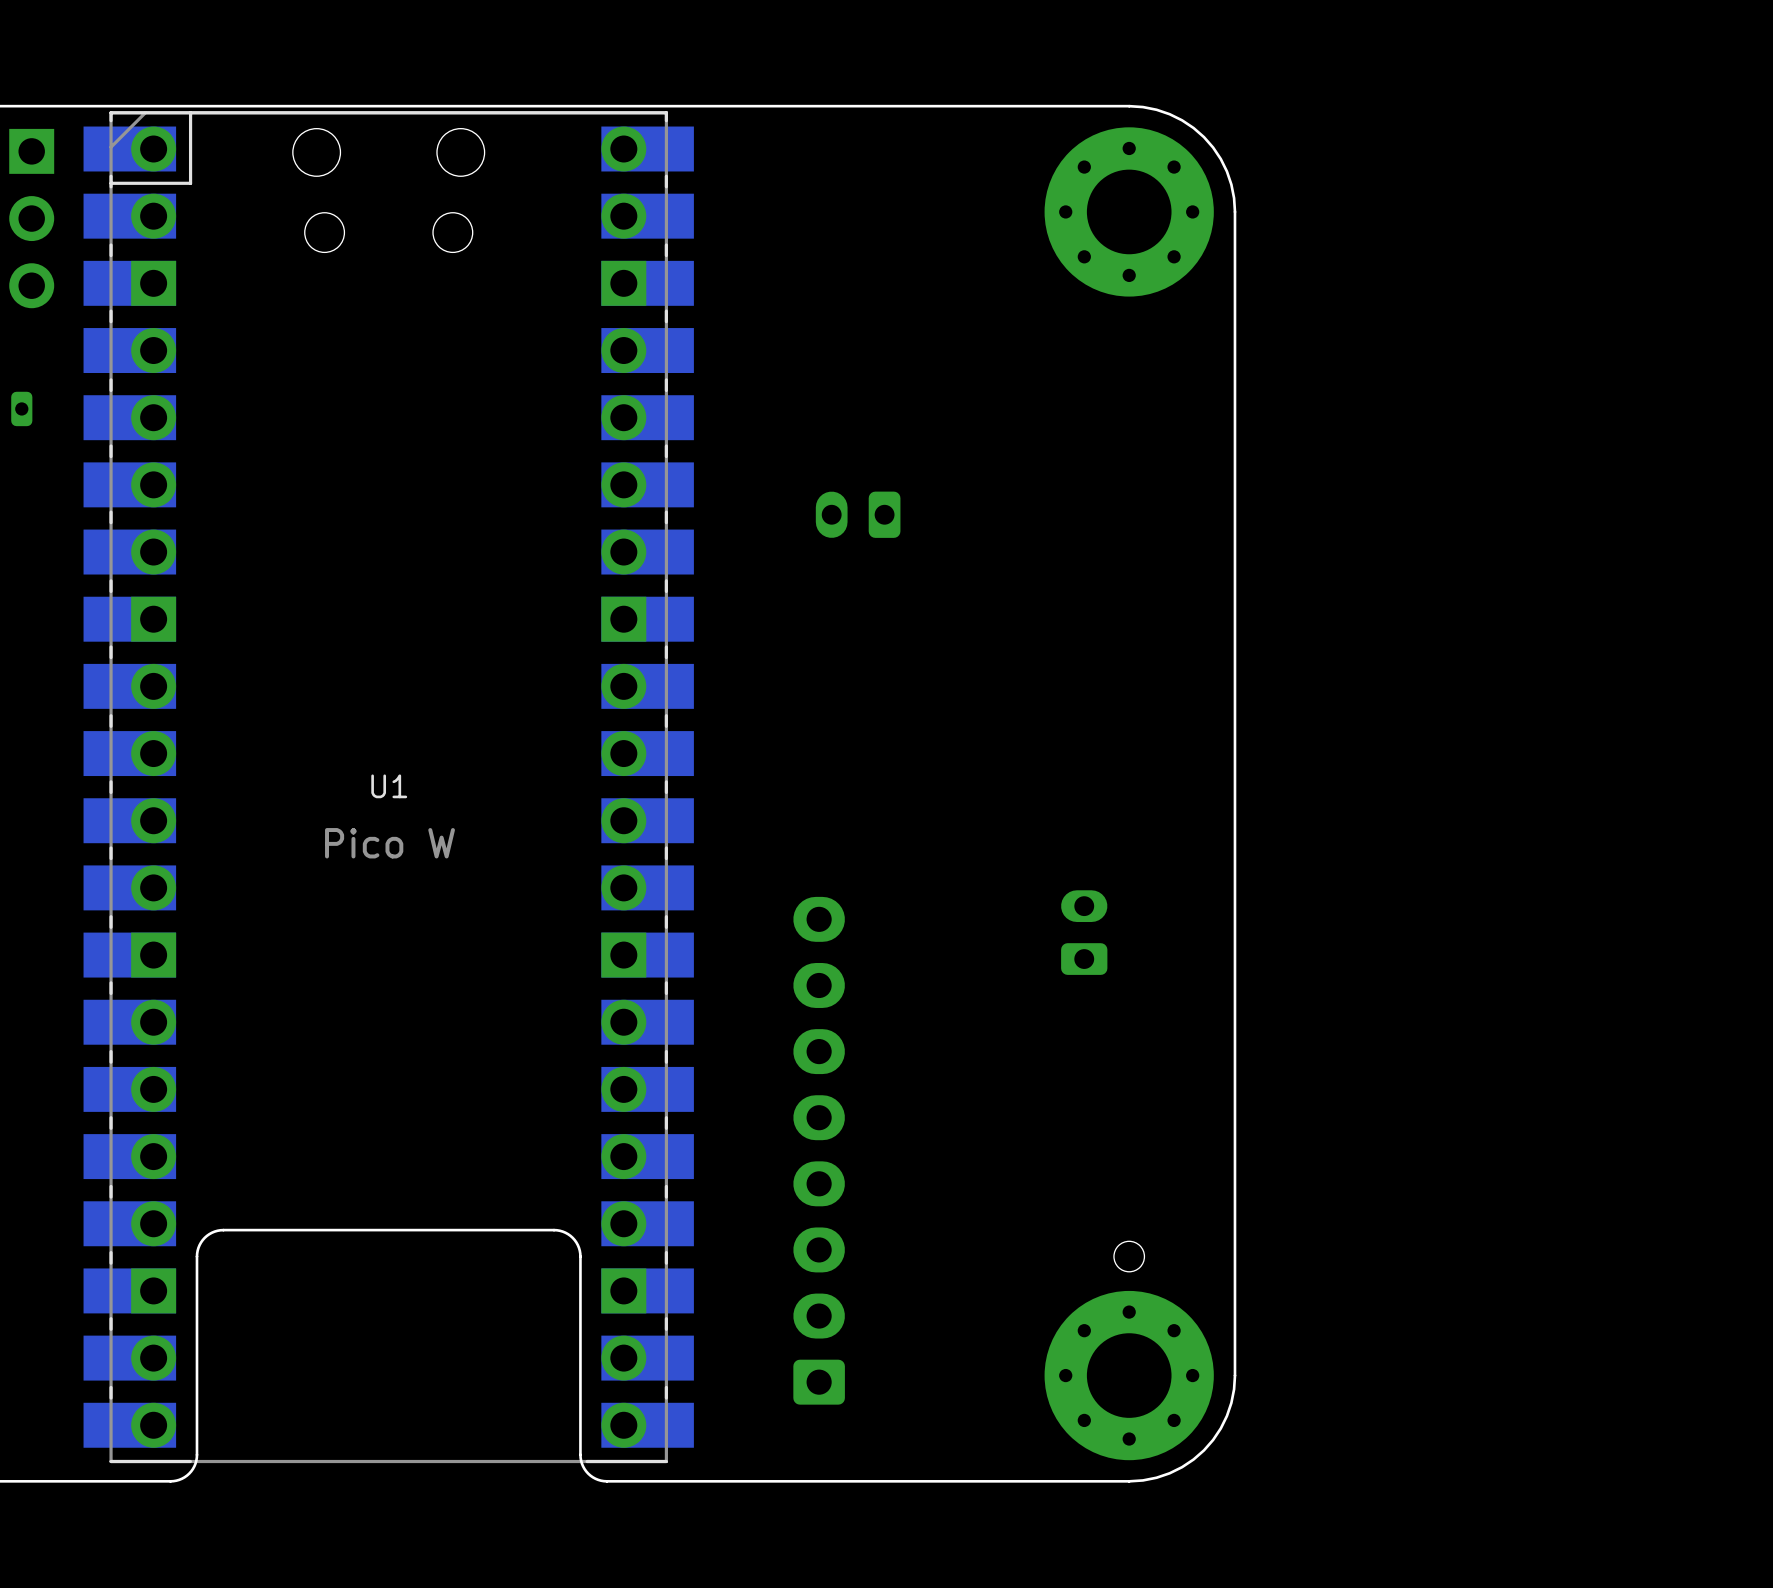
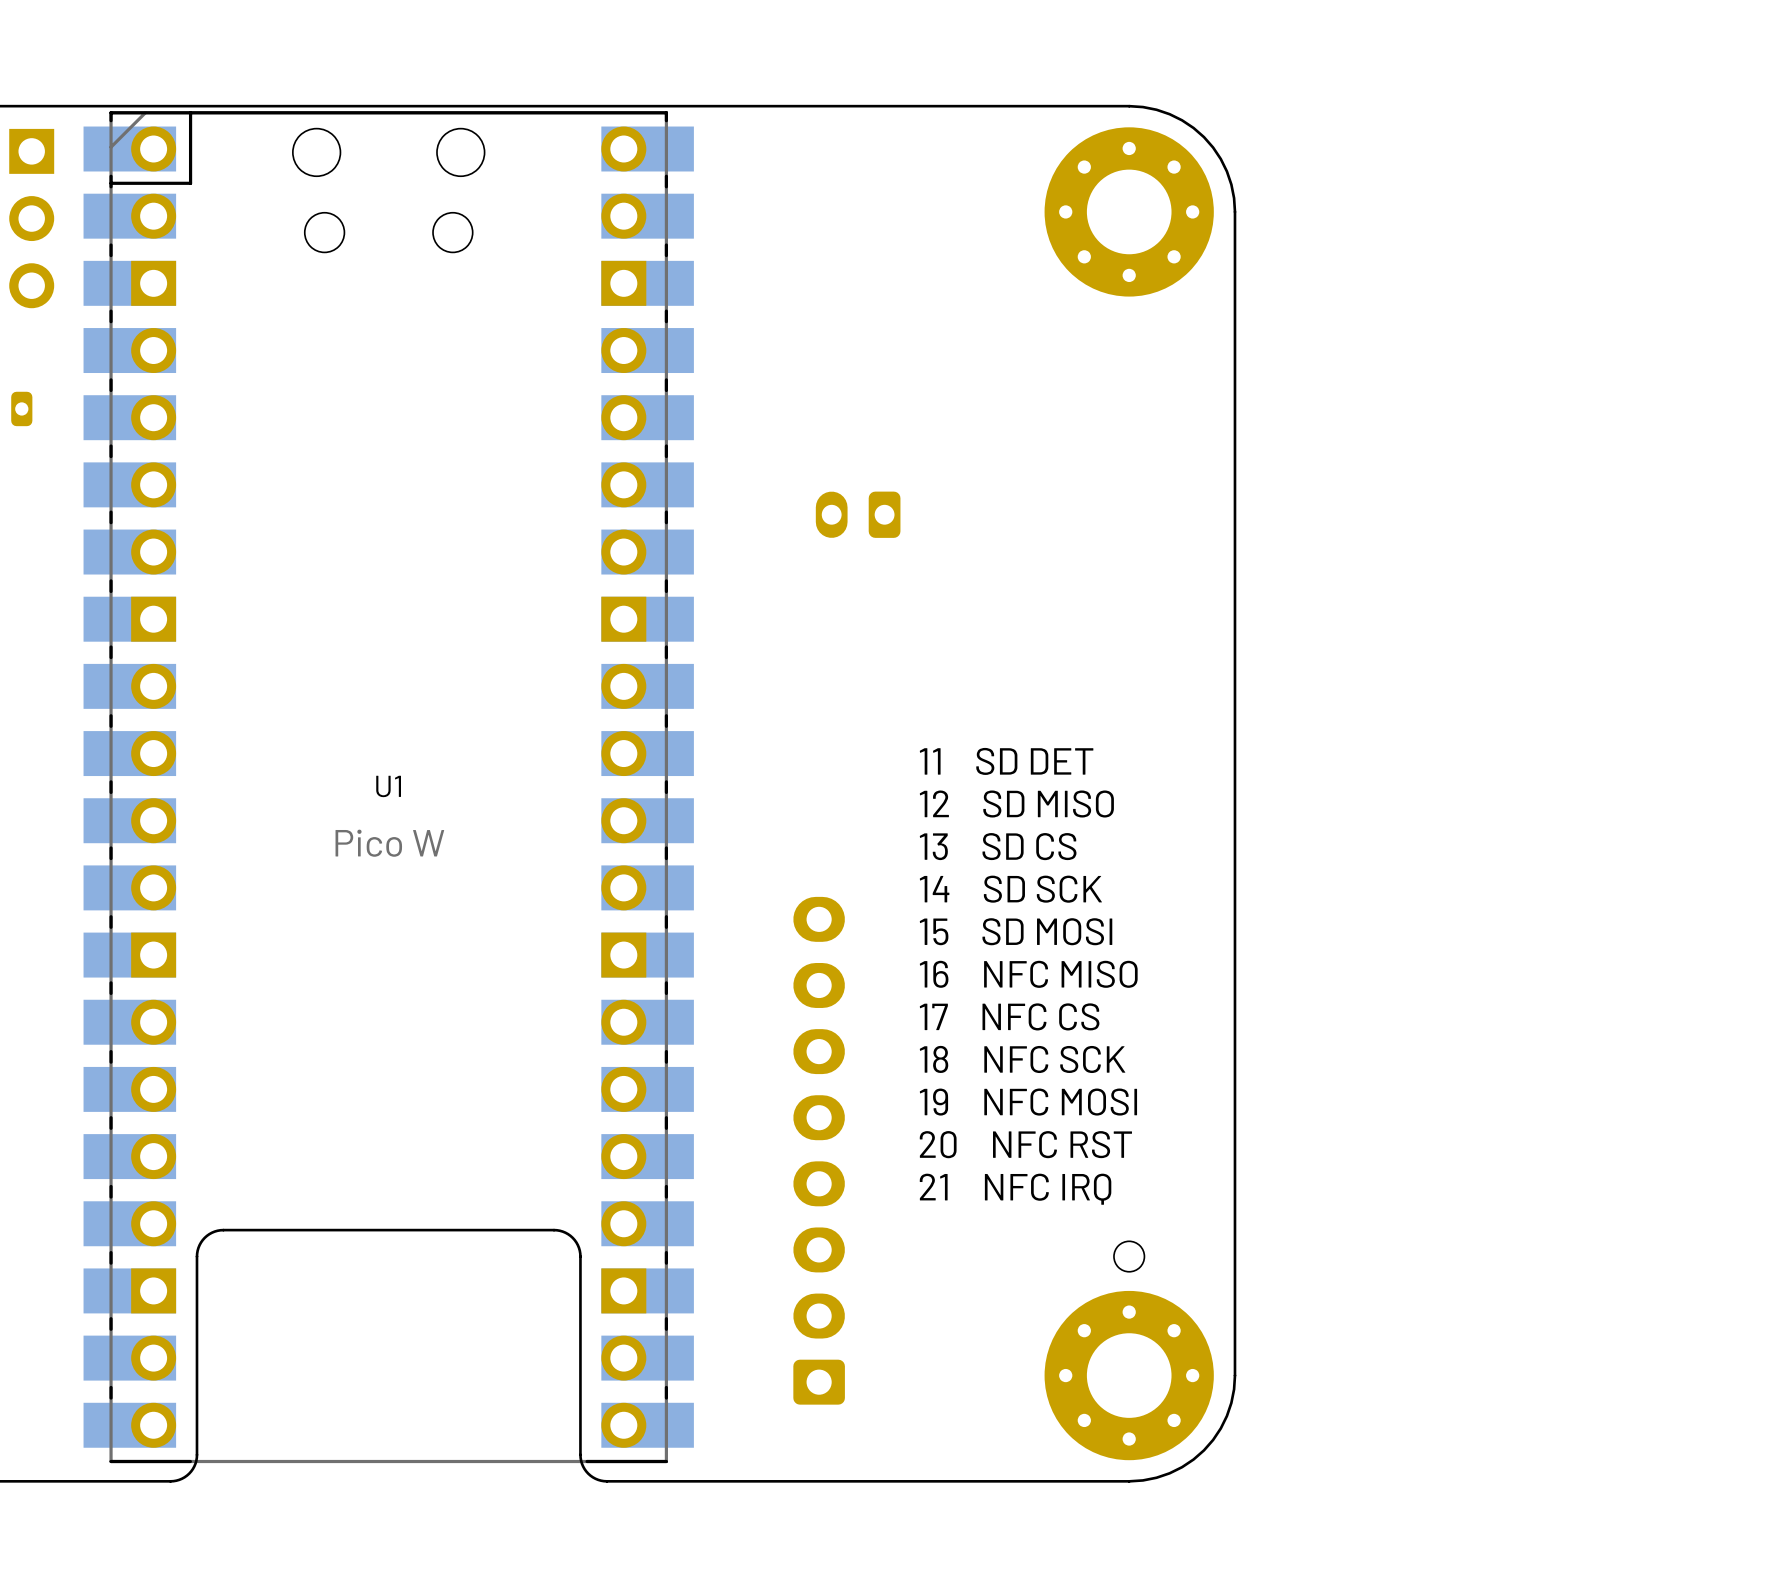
text: none -> 11 SD DET (1006, 761)
text: none -> 12 SD MISO (1016, 804)
text: none -> 13 SD CS (998, 846)
text: none -> 14 SD SCK (1010, 889)
text: none -> 15 SD MOSI (1016, 931)
part: (1084, 932) -> none
text: none -> 16 NFC MISO (1028, 974)
text: none -> 17 NFC CS (1009, 1016)
text: none -> 18 NFC SCK (1022, 1059)
text: none -> 19 NFC MOSI (1028, 1102)
text: none -> 20 NFC RST (1025, 1144)
text: none -> 21 NFC IRQ (1015, 1189)

